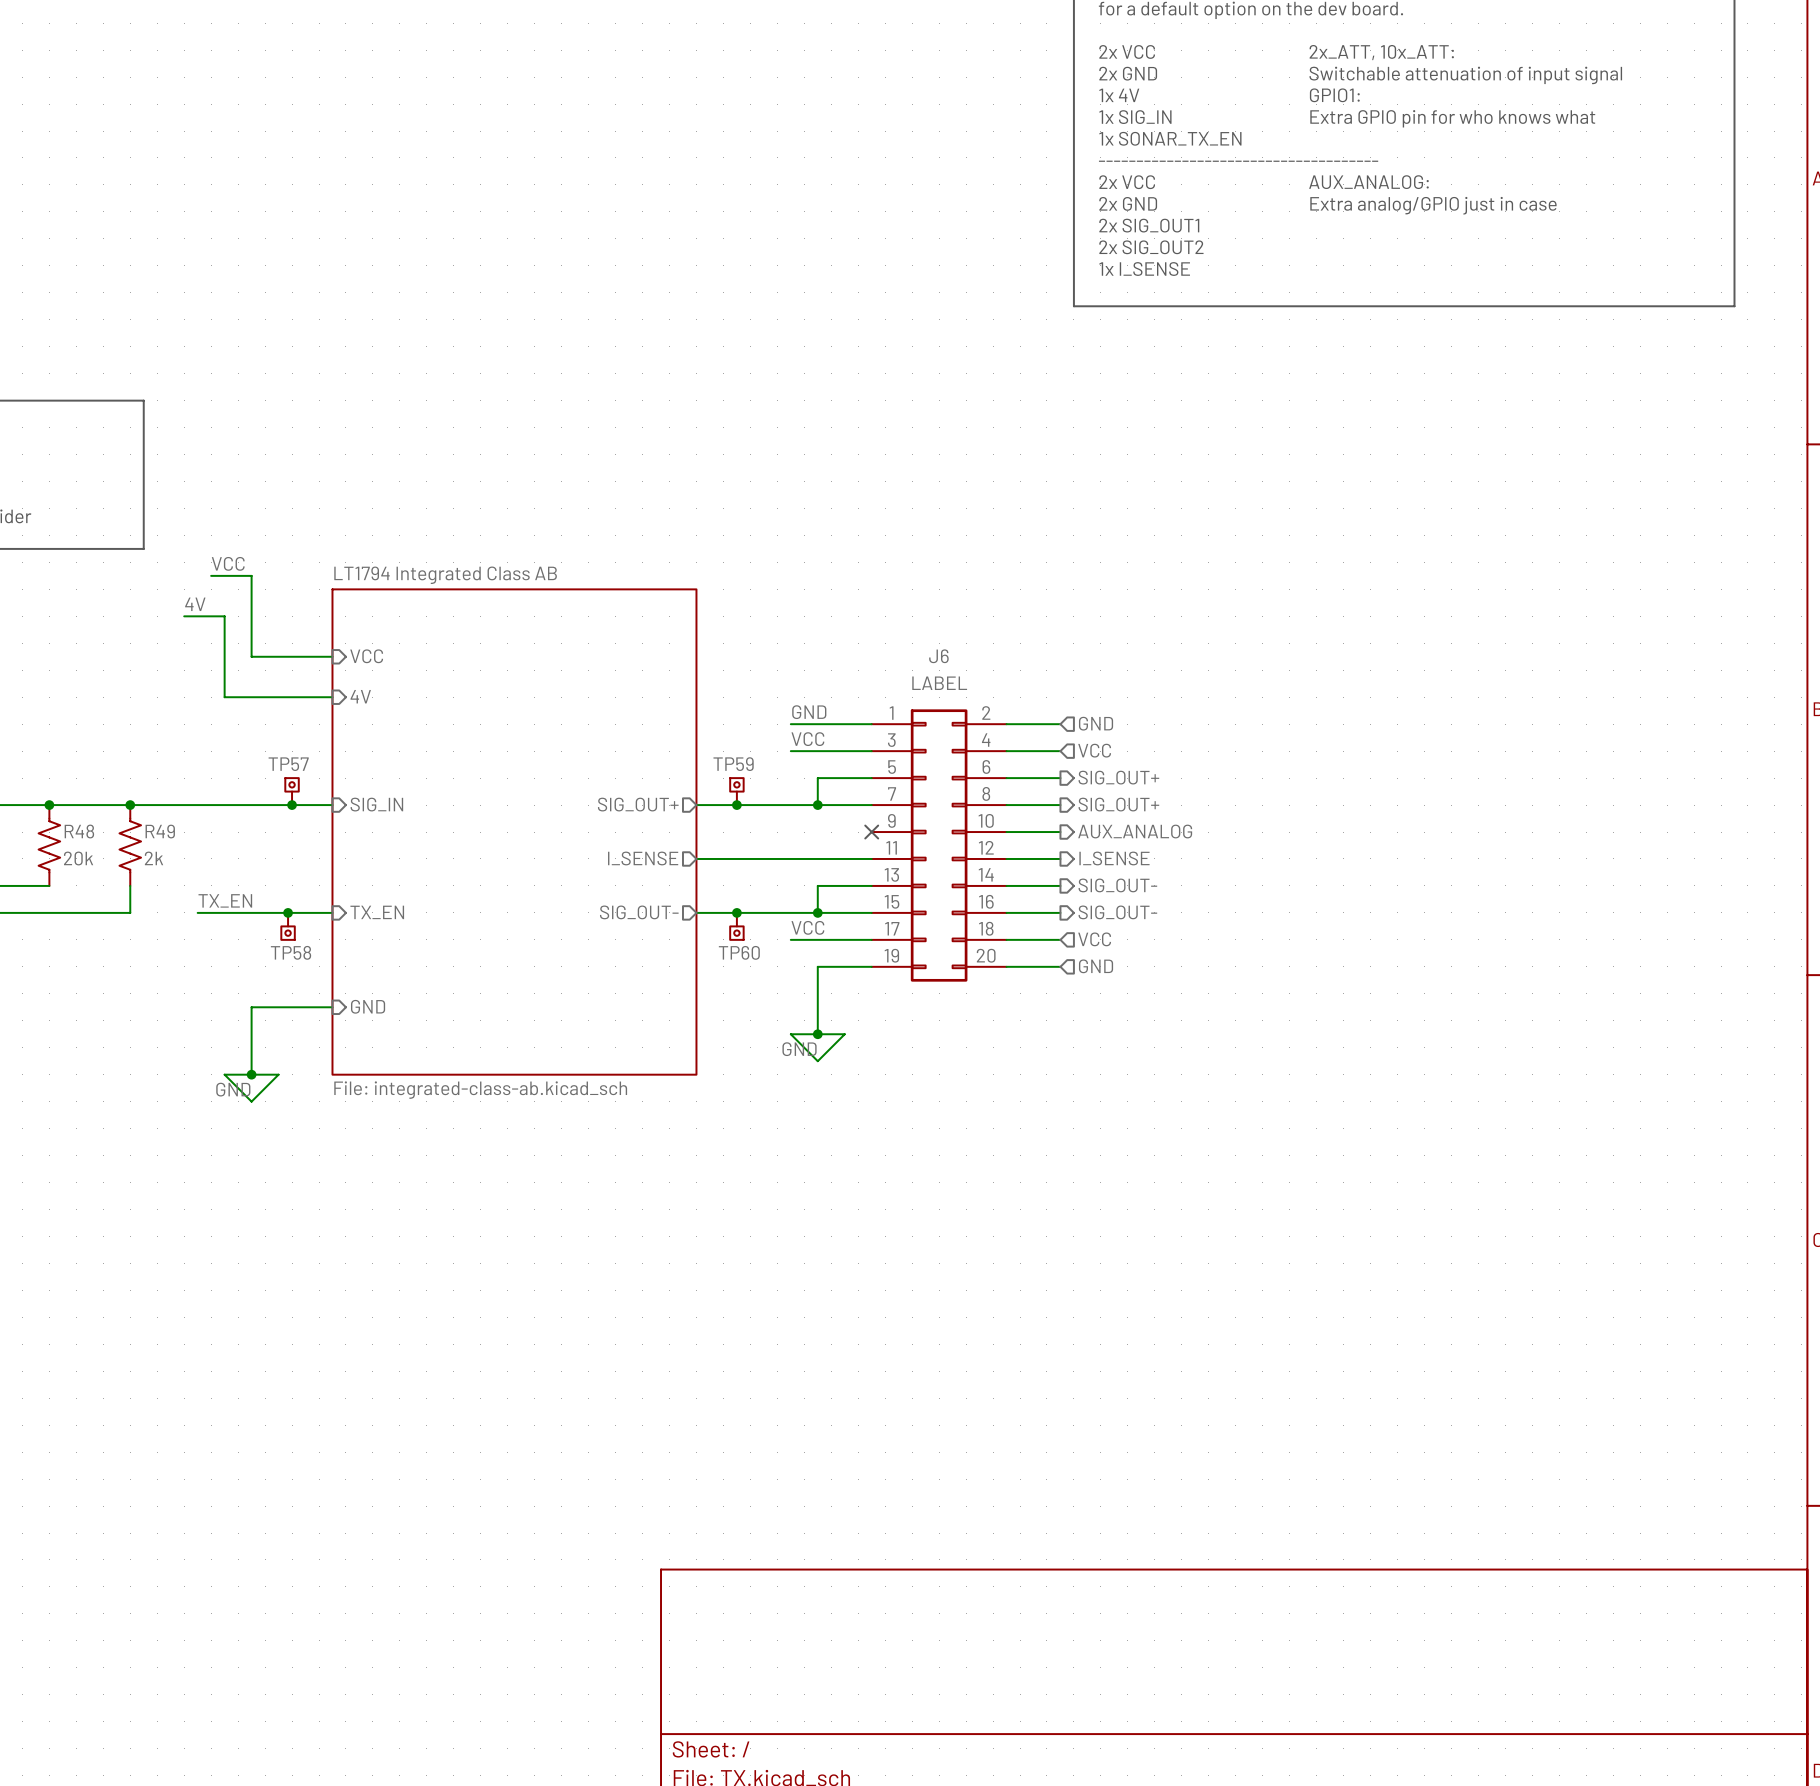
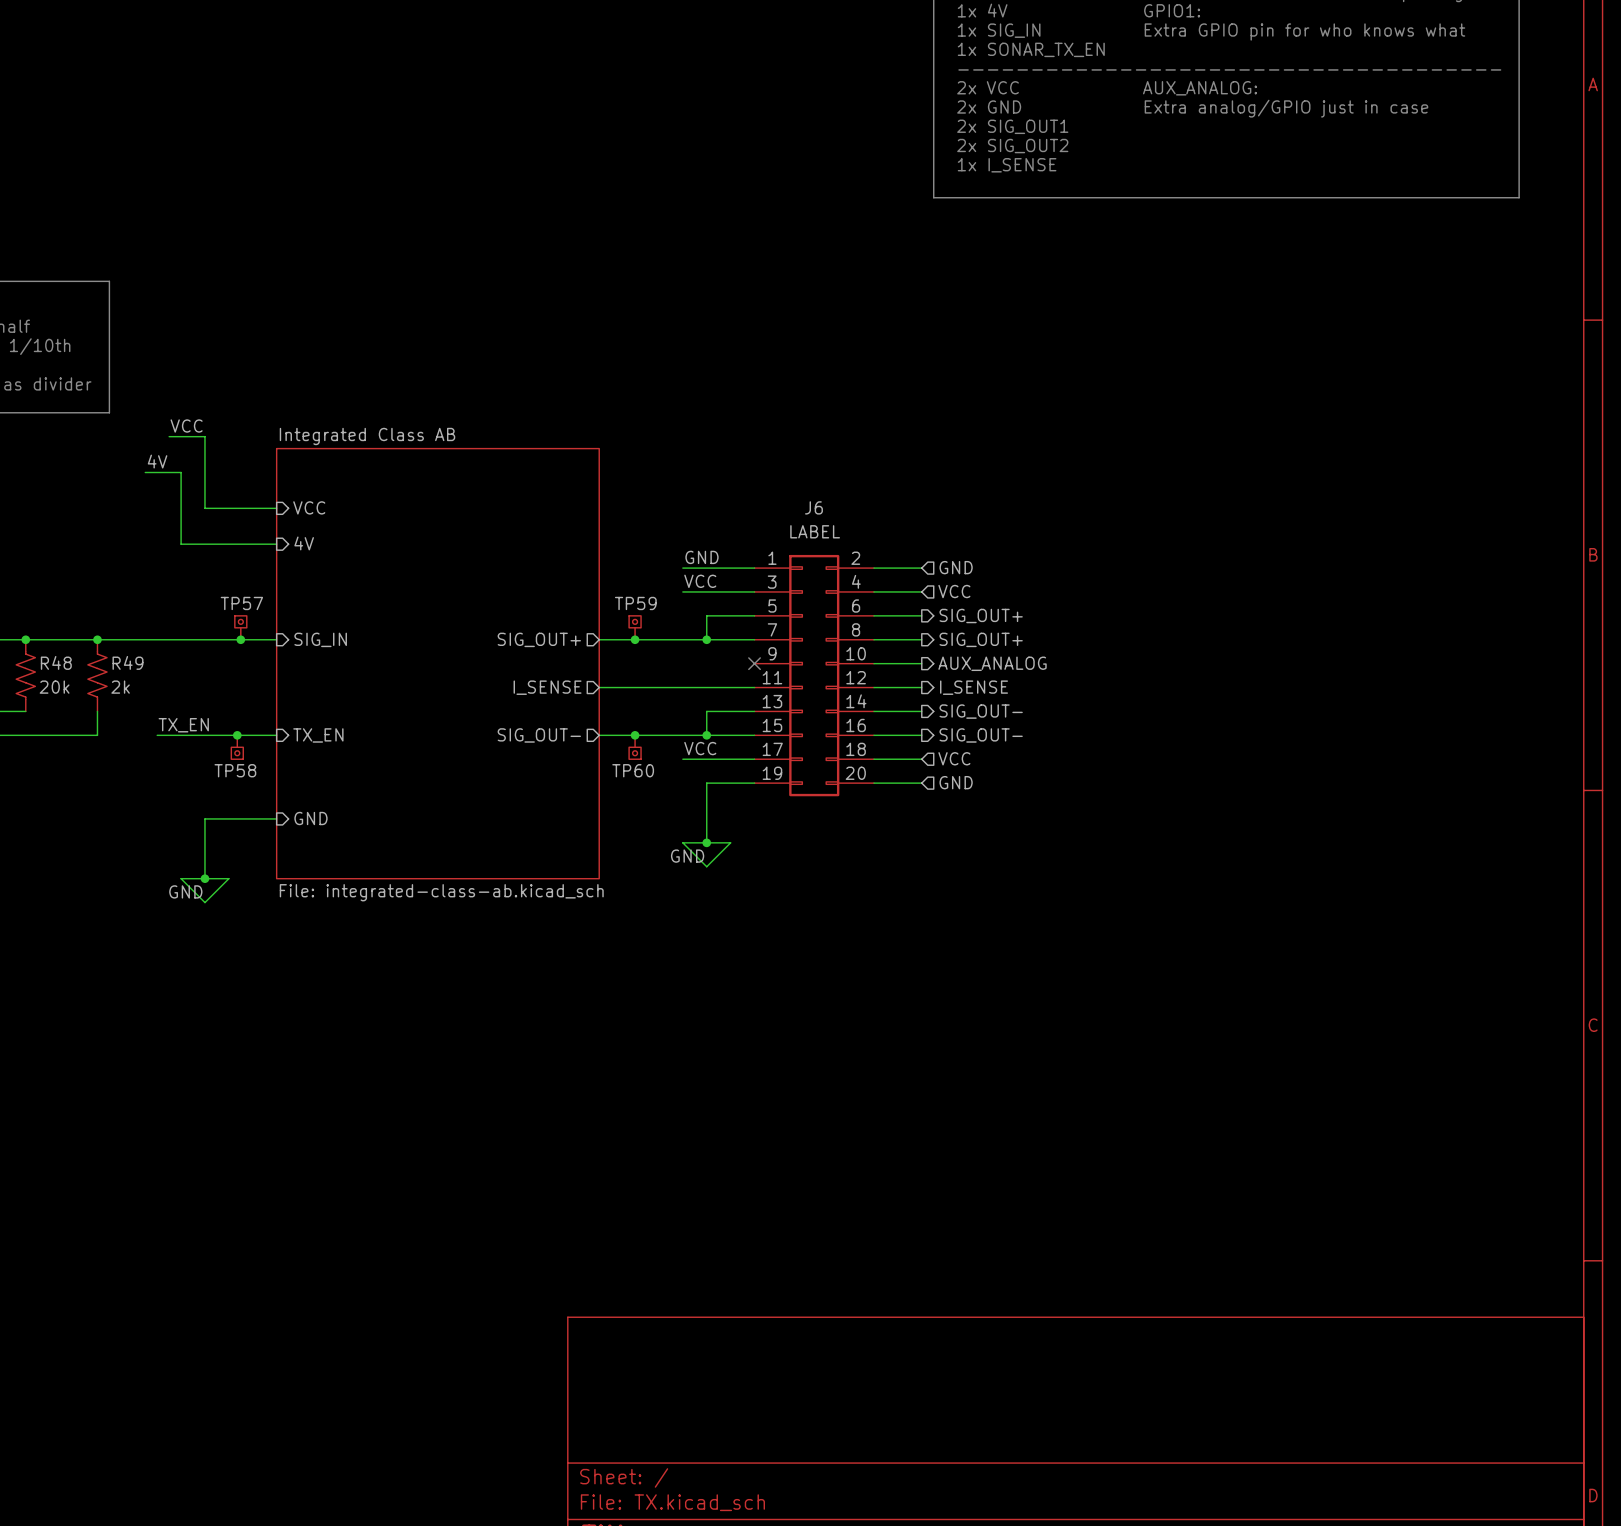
sheet LT1794 Integrated Class AB name: LT1794 Integrated Class AB (445, 575) -> Integrated Class AB (367, 436)

